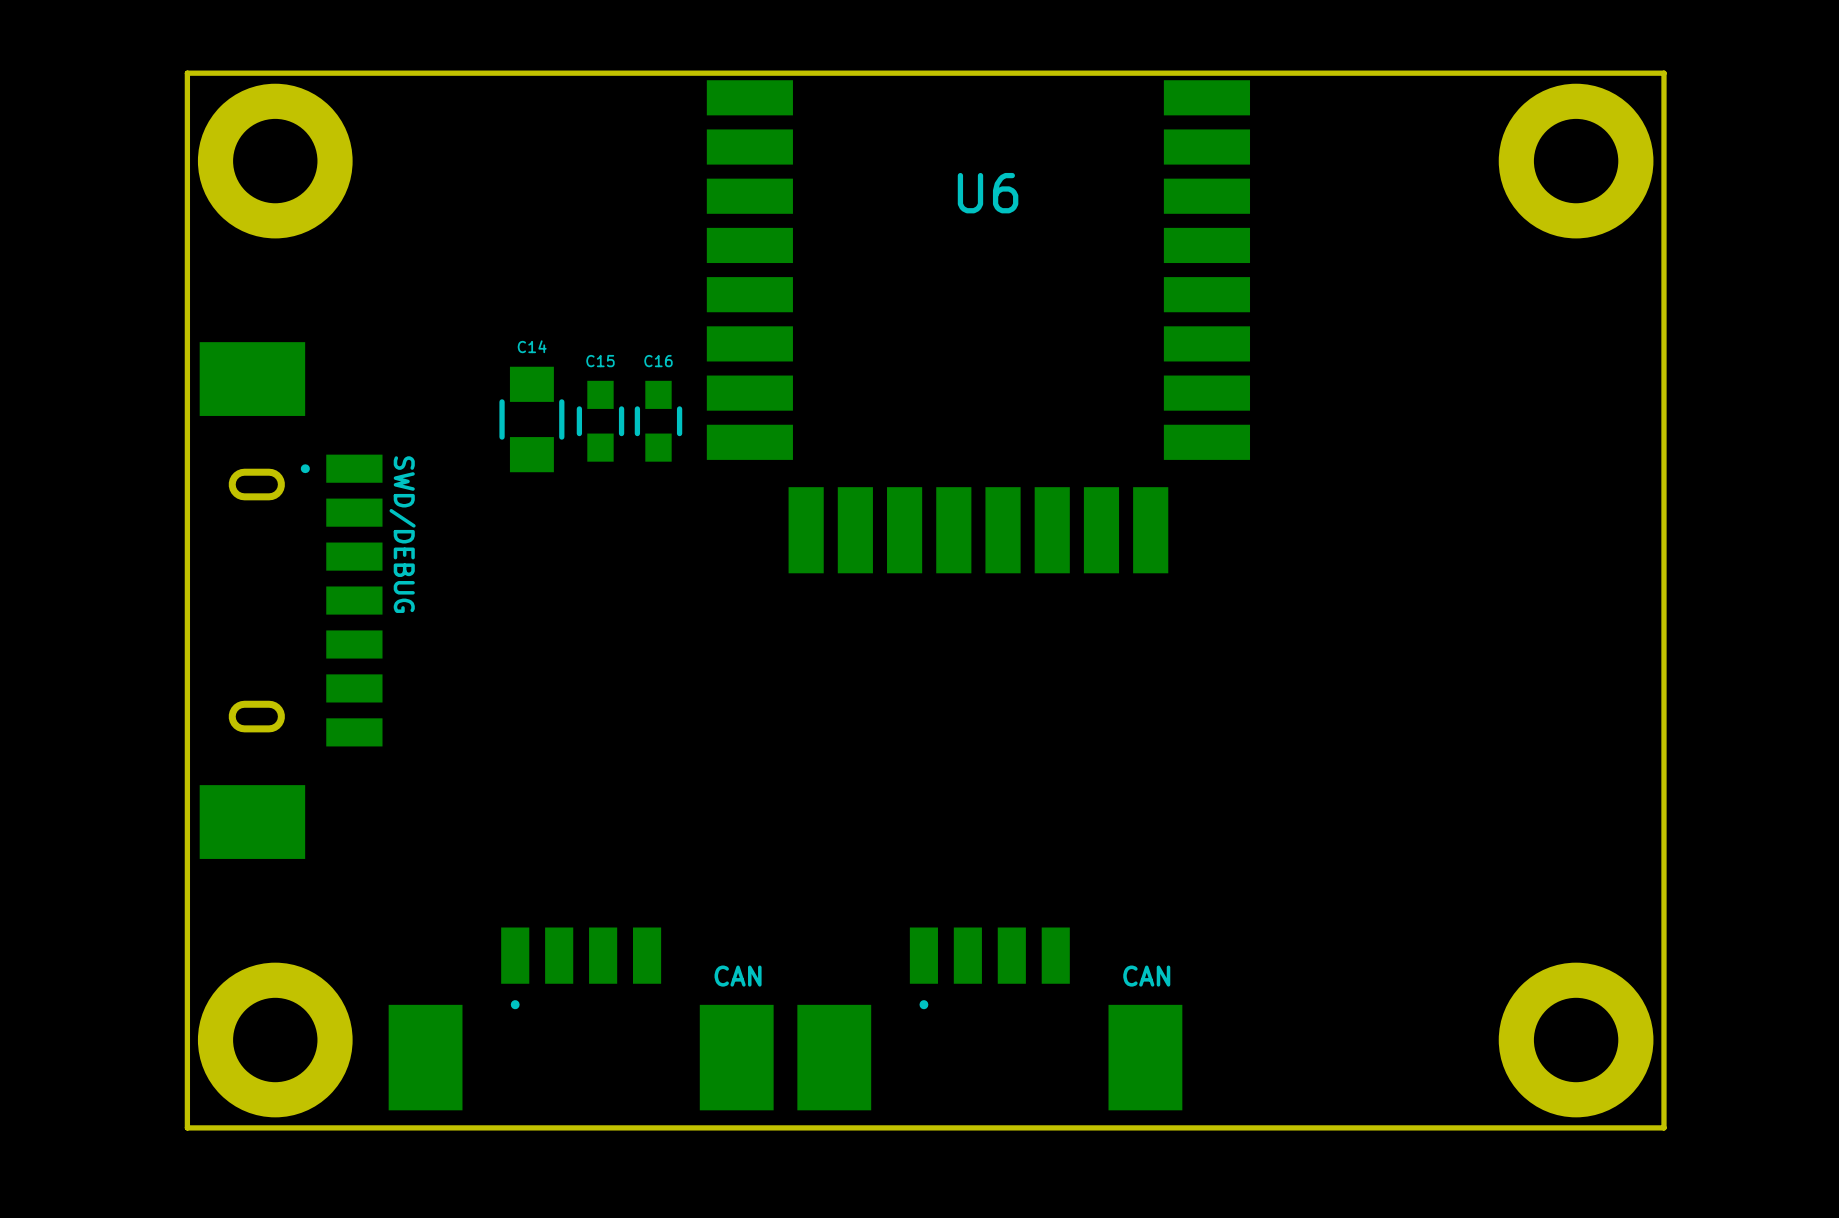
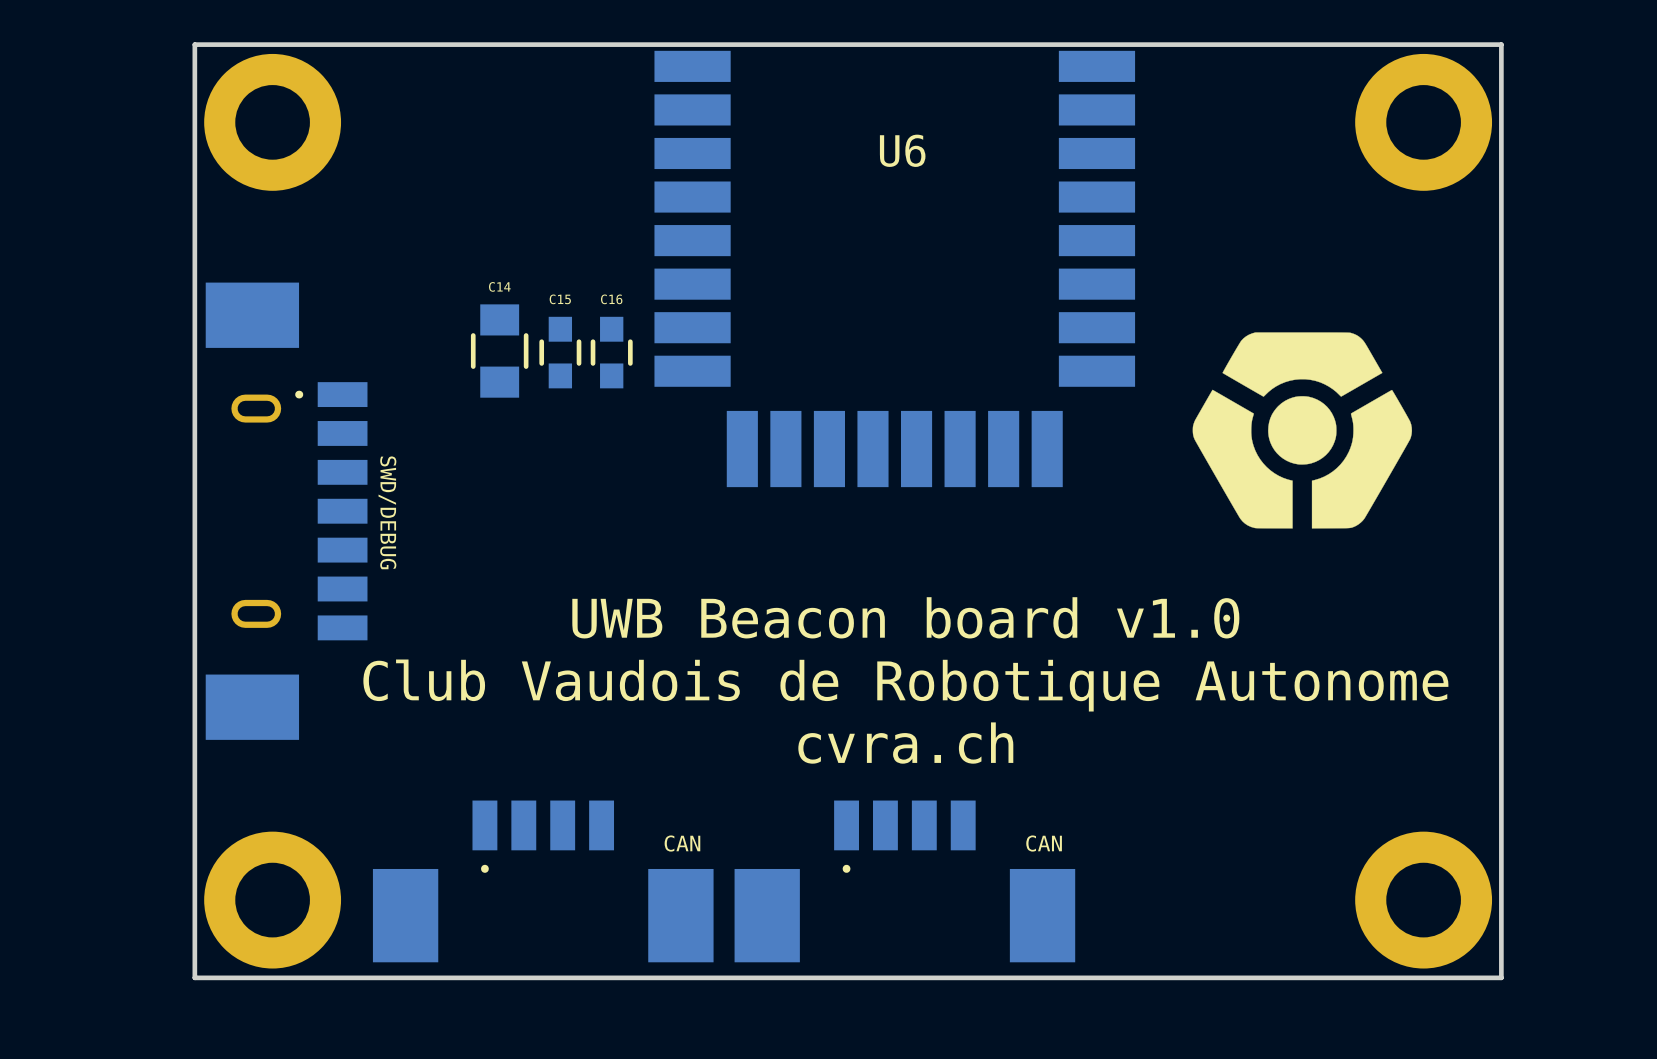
drawing: none -> [1192, 332, 1413, 529]
part value position: SWD/DEBUG (402, 534) -> SWD/DEBUG (387, 512)
text: none -> UWB Beacon board v1.0 (905, 617)
text: none -> Club Vaudois de Robotique Autonome (905, 685)
text: none -> cvra.ch (905, 743)

